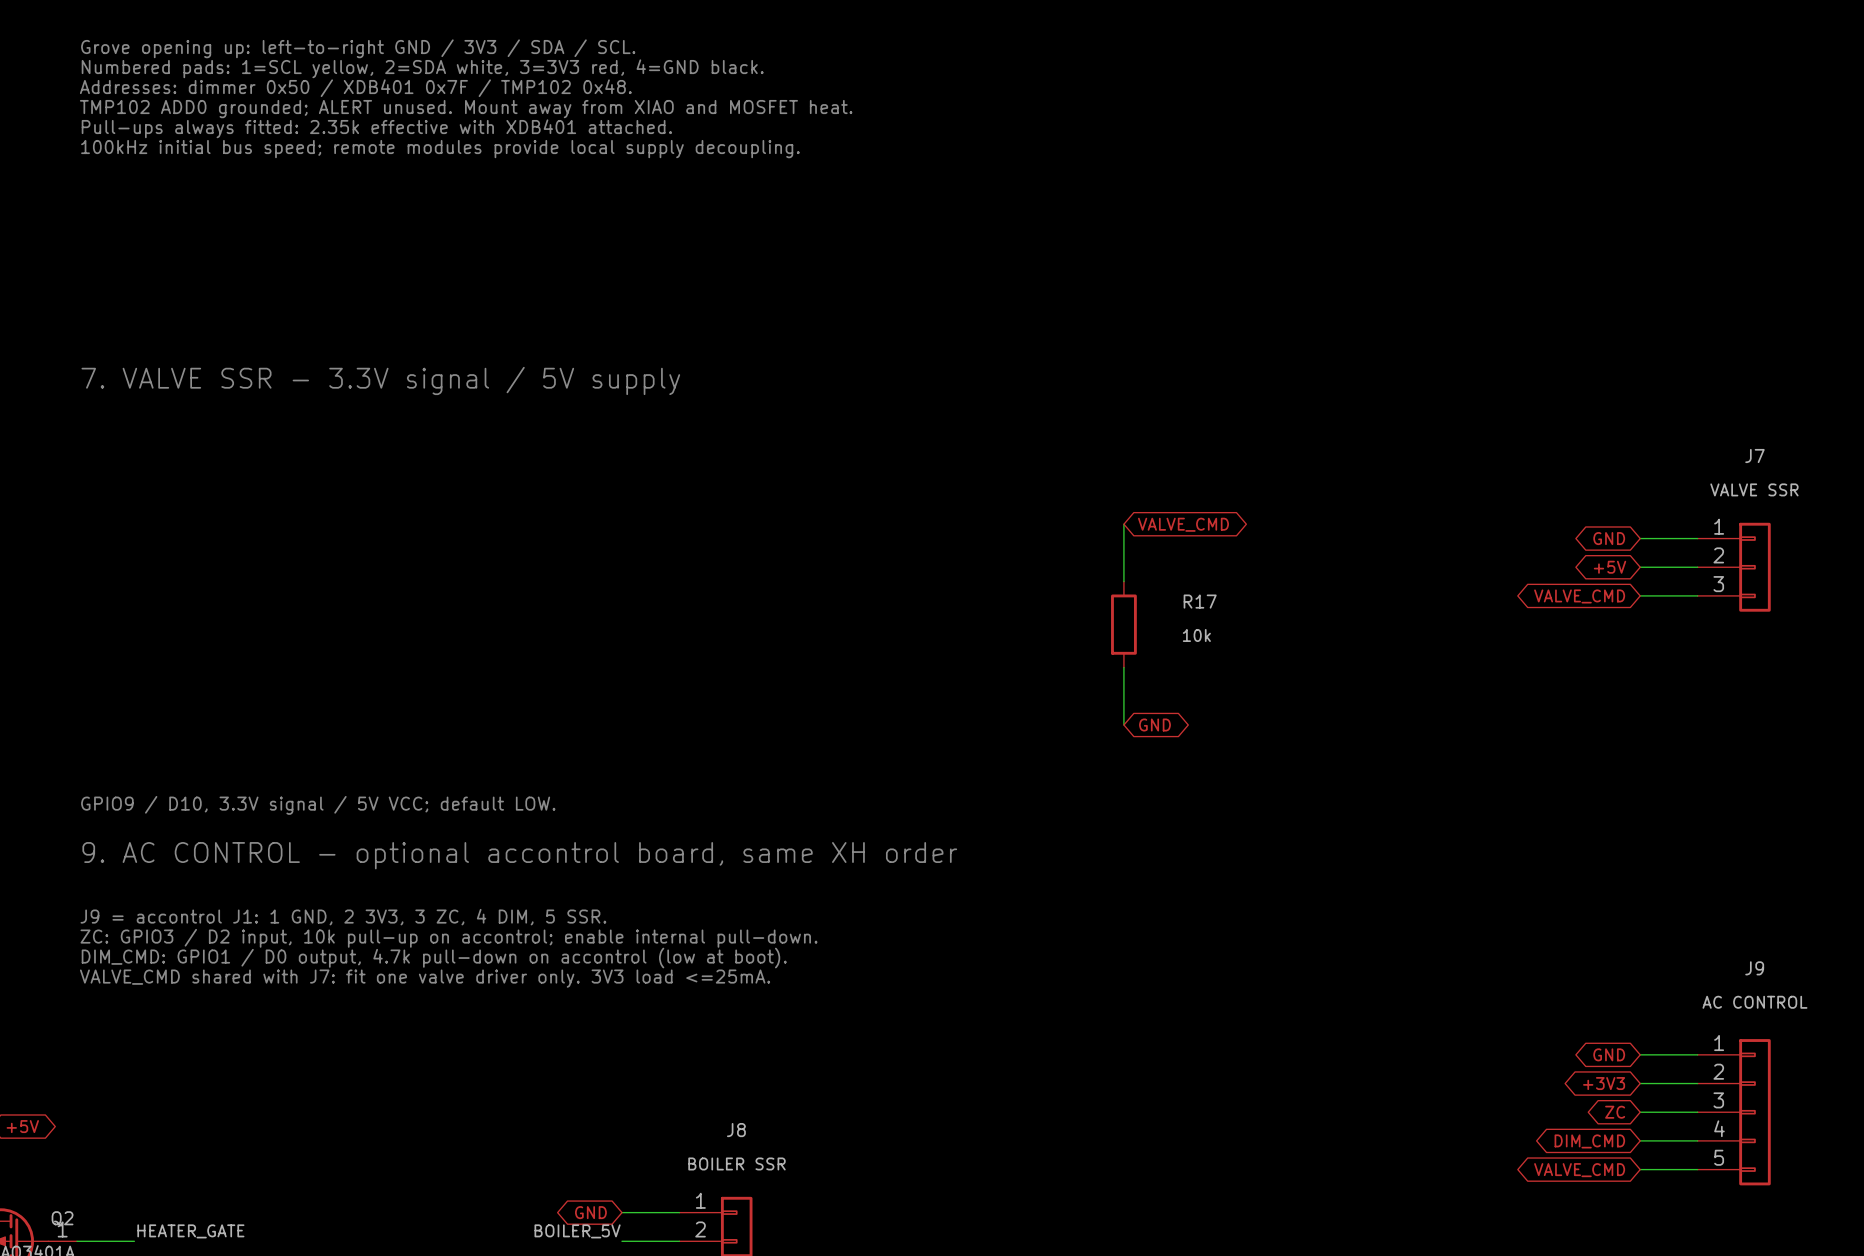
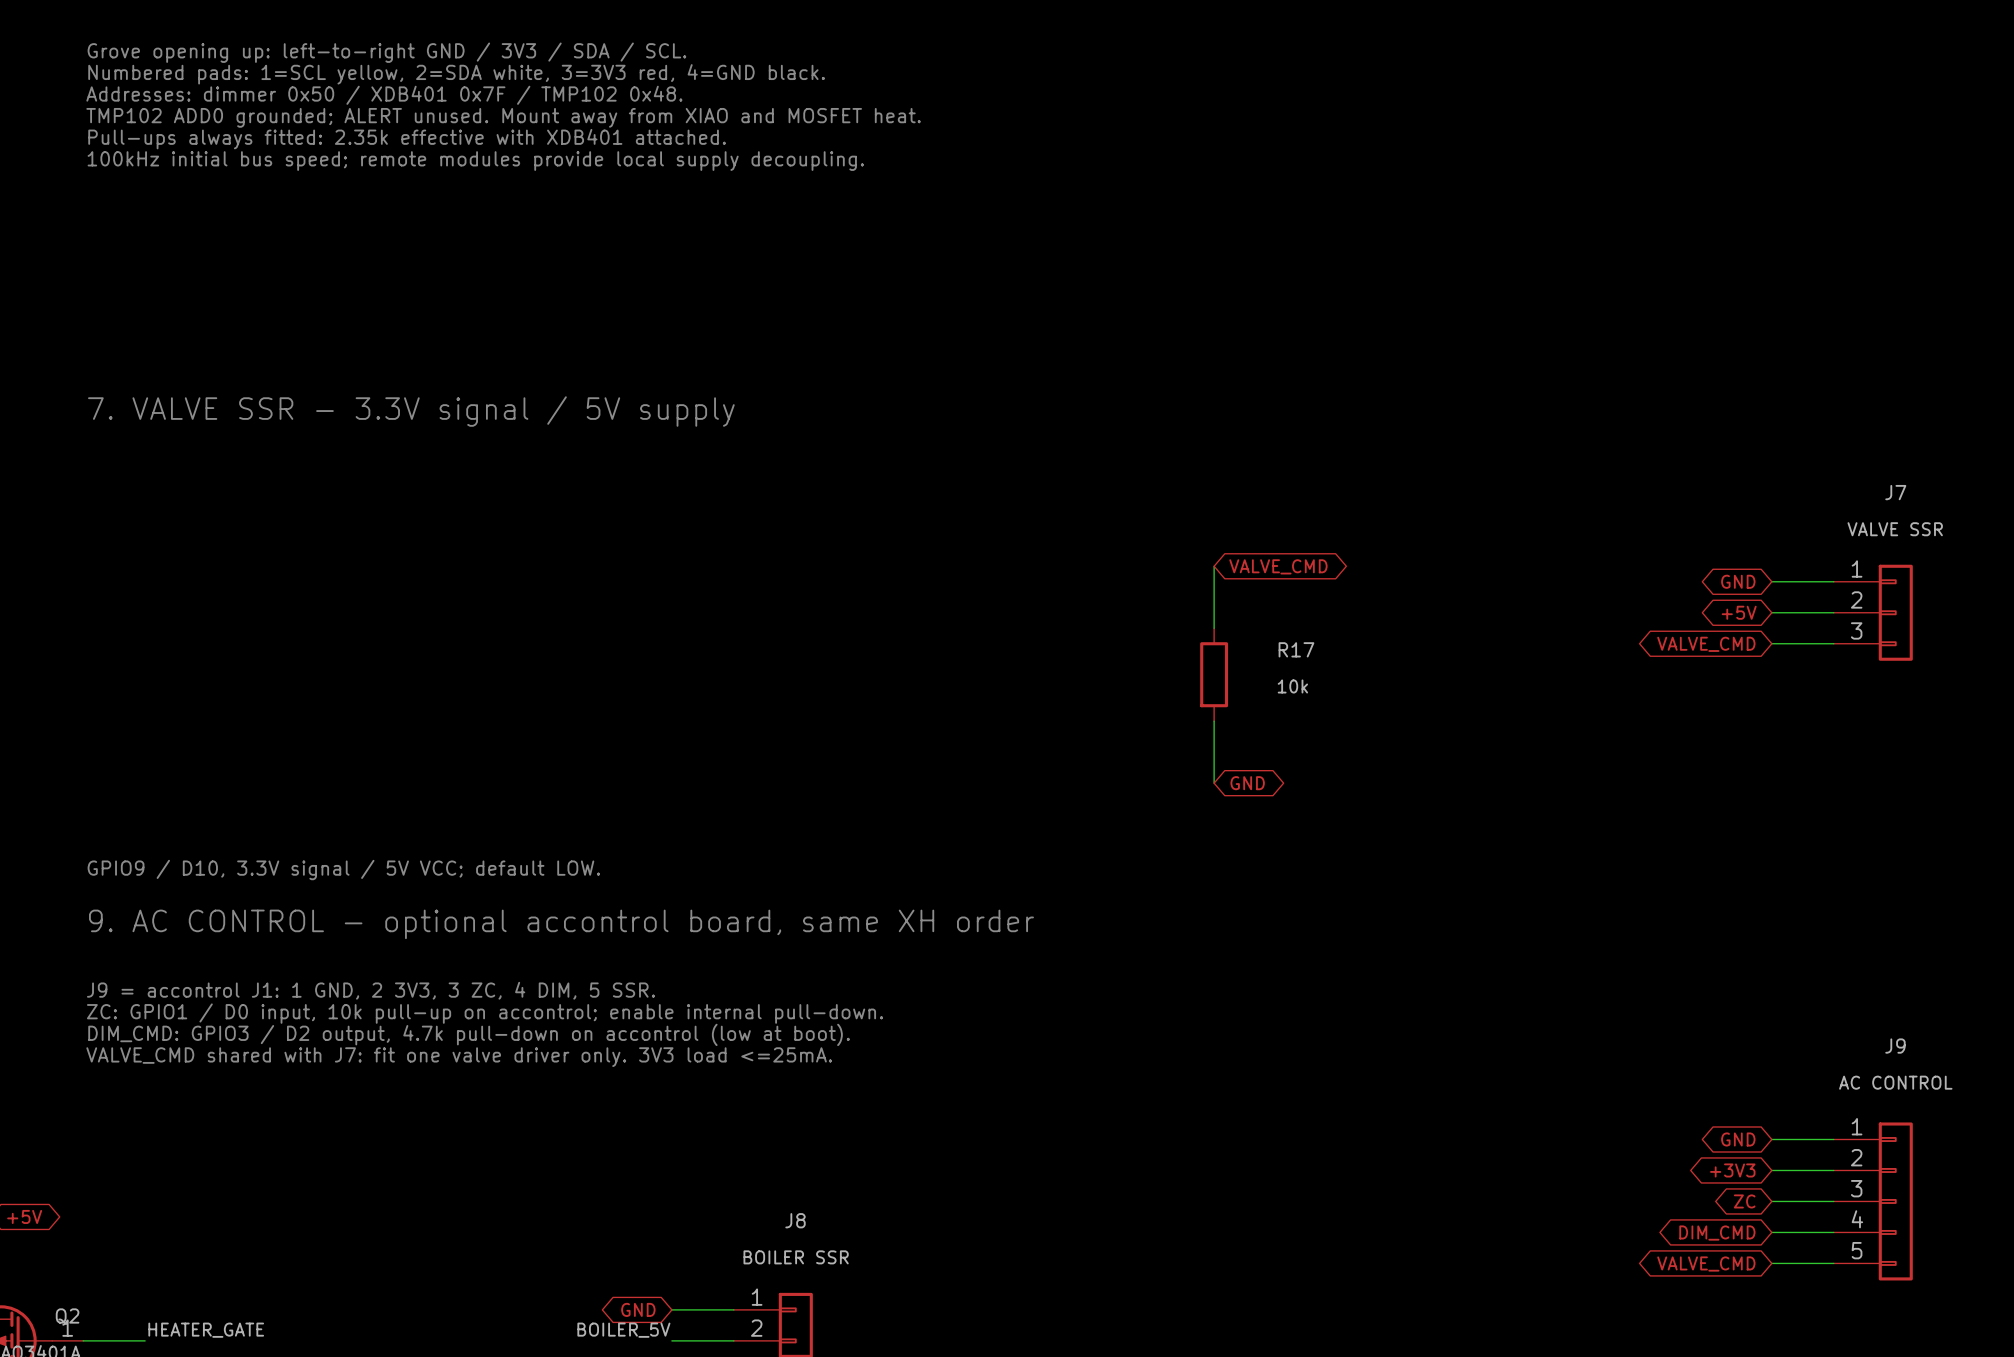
text: ZC: GPIO3 / D2 input, 10k pull-up on accontrol; enable internal pull-down. (449, 938) -> ZC: GPIO1 / D0 input, 10k pull-up on accontrol; enable internal pull-down. (485, 1013)
text: DIM_CMD: GPIO1 / D0 output, 4.7k pull-down on accontrol (low at boot). (434, 958) -> DIM_CMD: GPIO3 / D2 output, 4.7k pull-down on accontrol (low at boot). (469, 1034)

